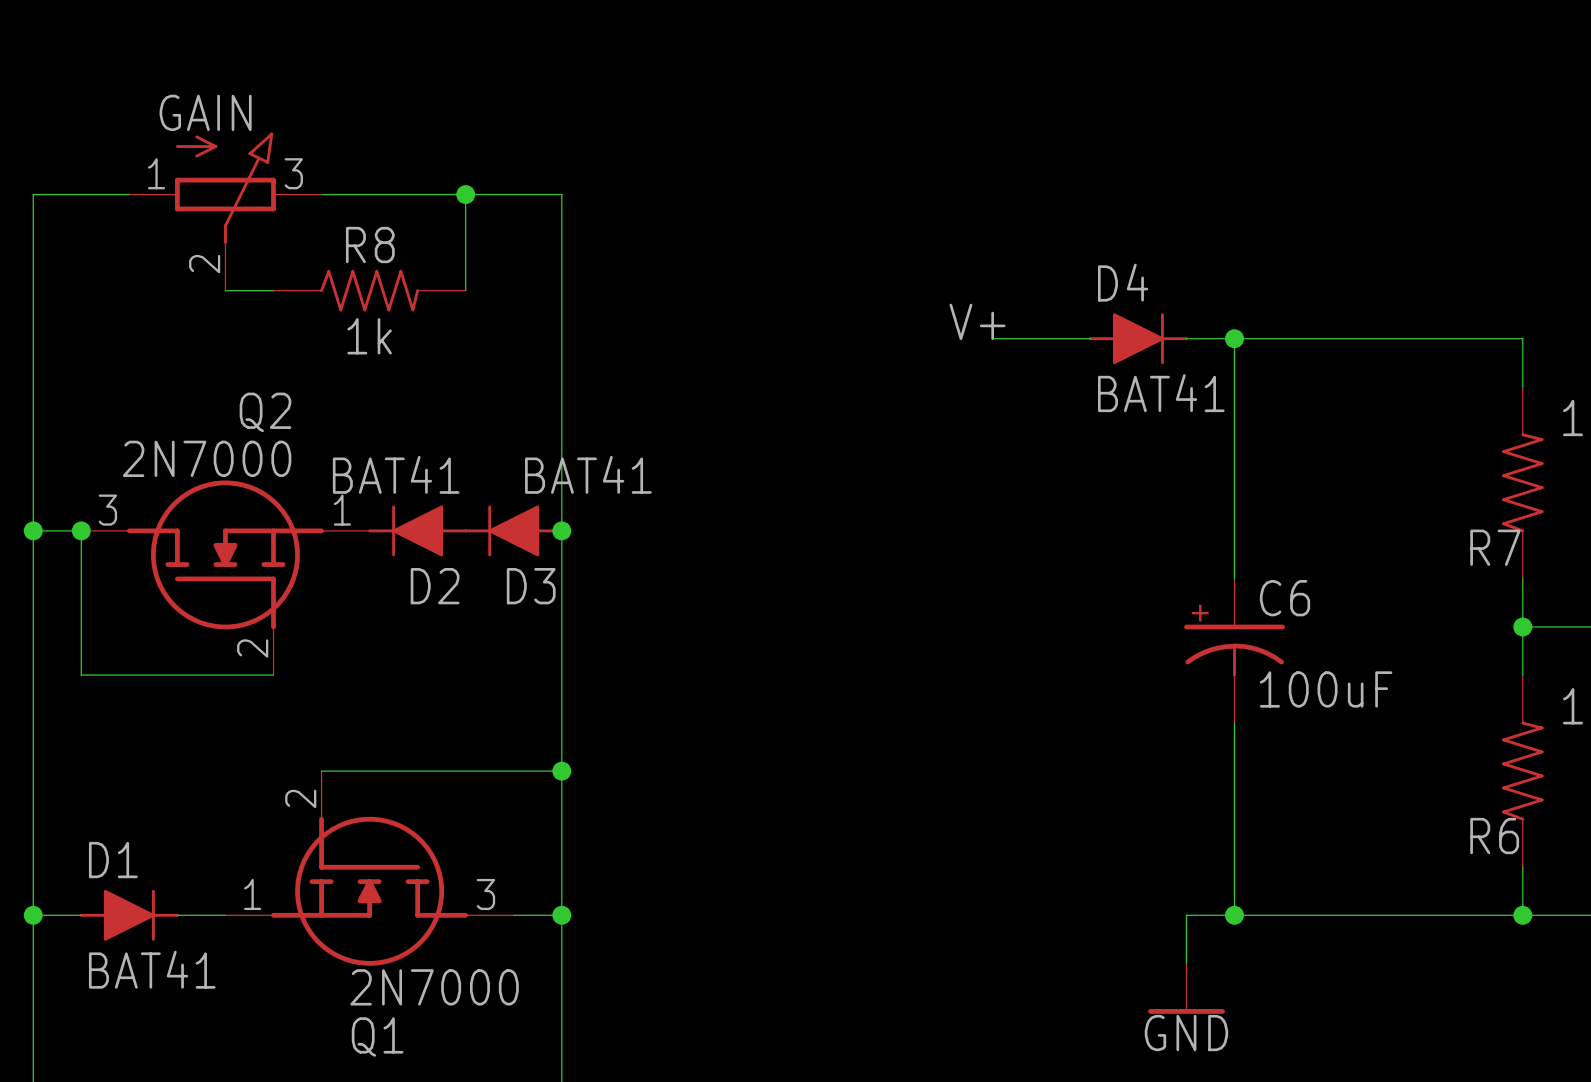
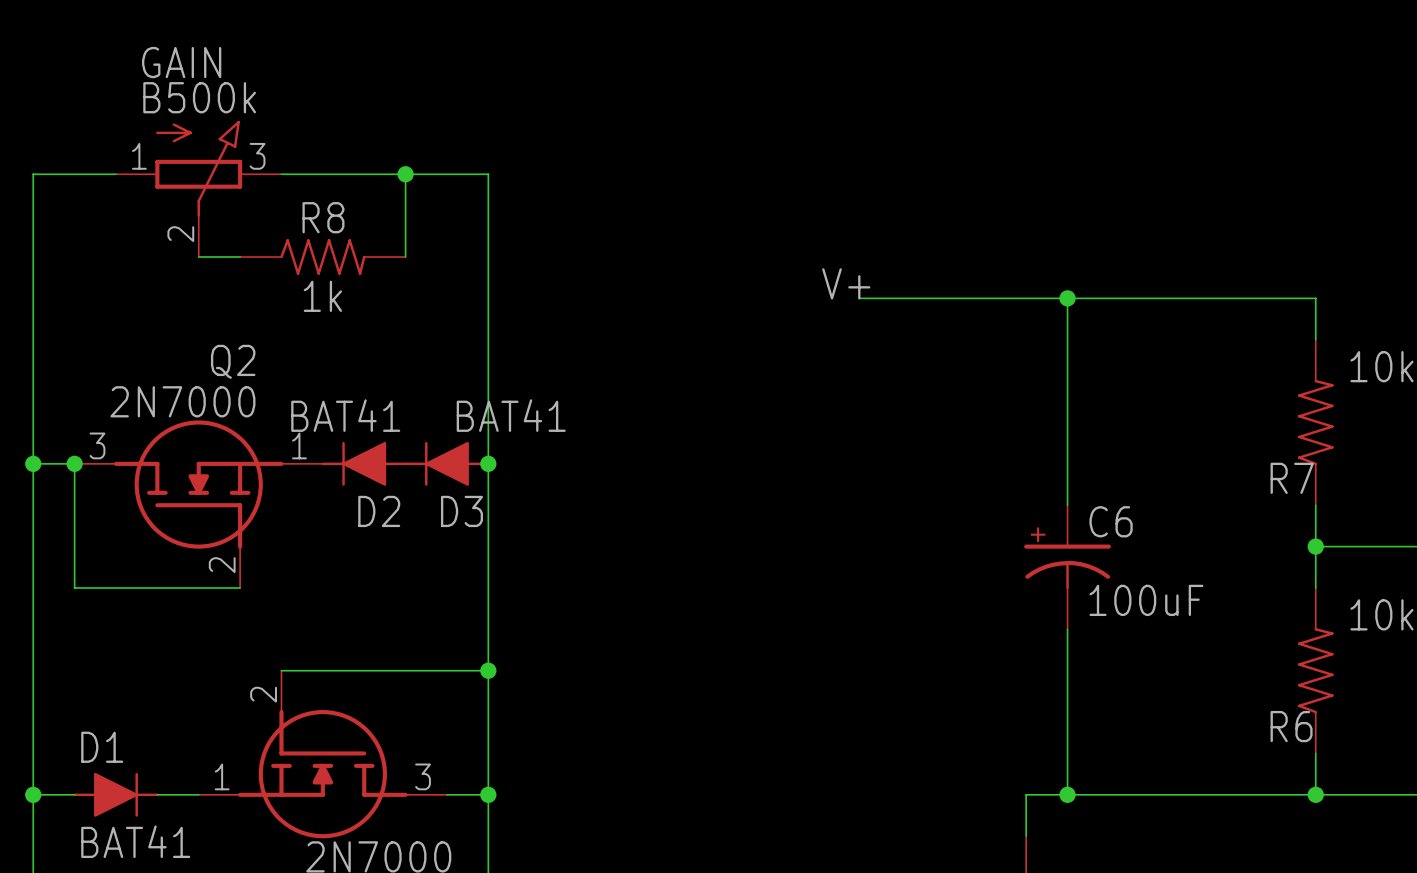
GAIN value: none -> B500k (199, 97)
GAIN name position: GAIN (205, 112) -> GAIN (181, 62)
D4: BAT41 (1138, 338) -> none

